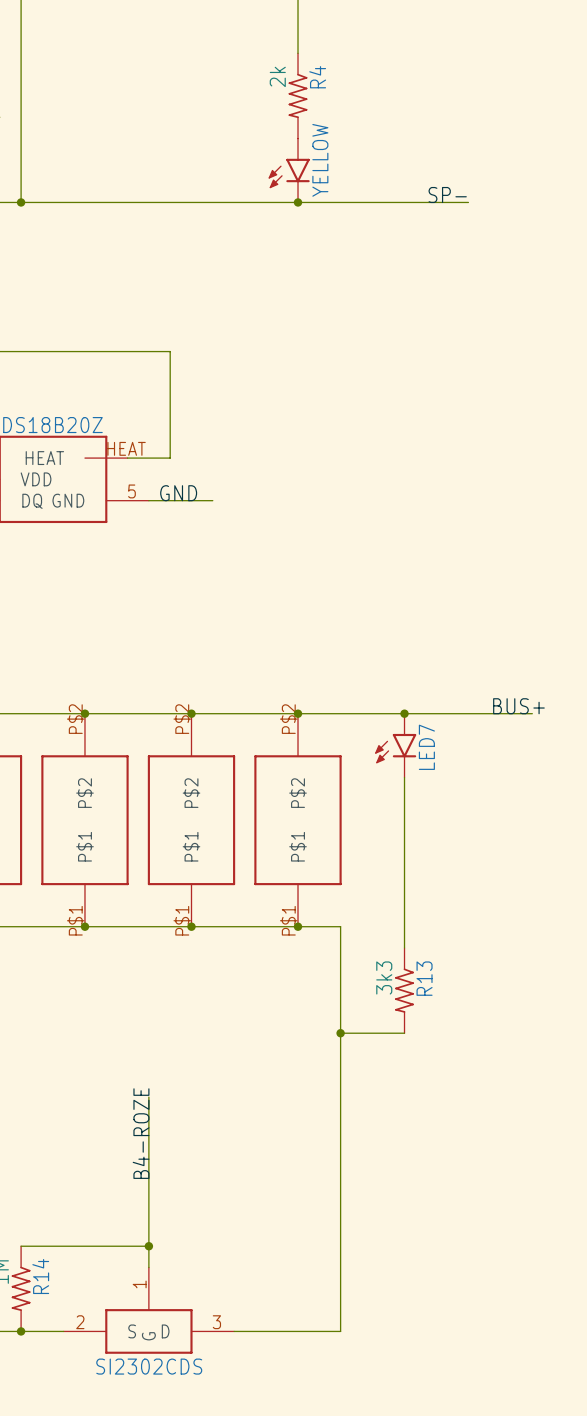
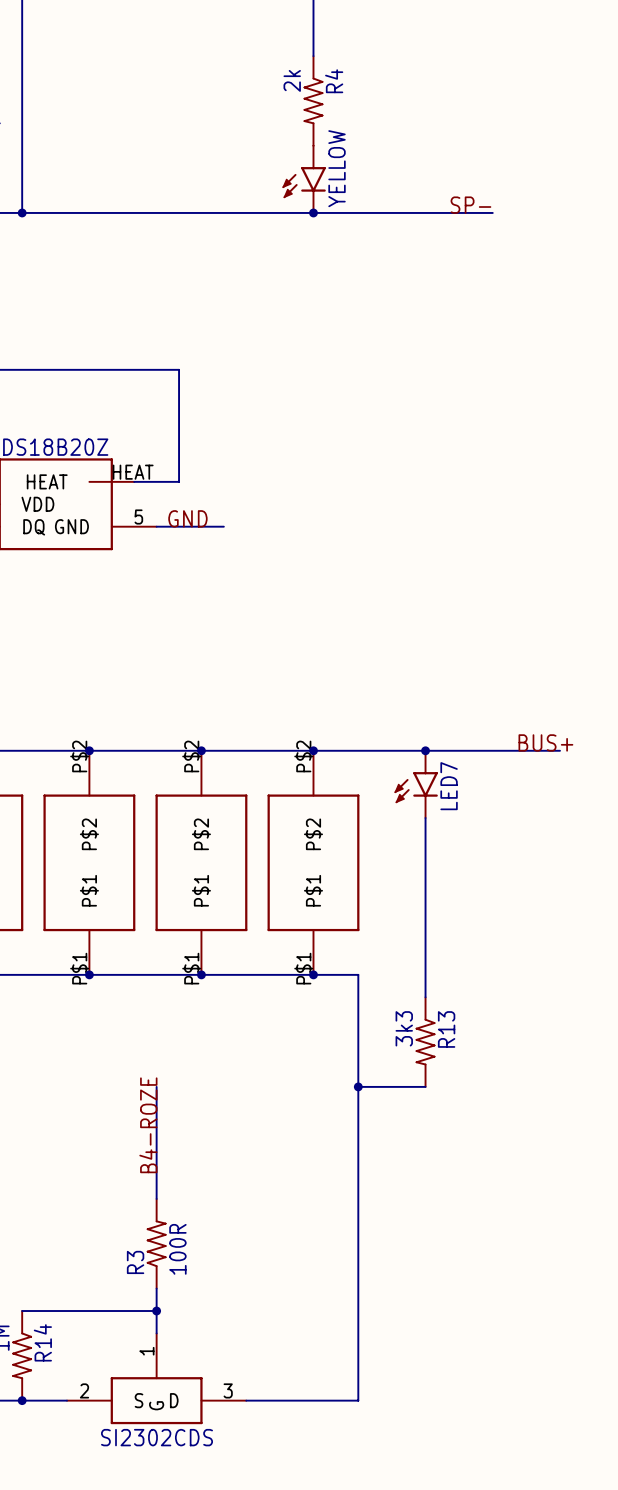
wire: none -> (156, 1086) (156, 1154)
label position: B4-ROZE (141, 1133) -> B4-ROZE (148, 1125)
R3: none -> 100R (156, 1243)

